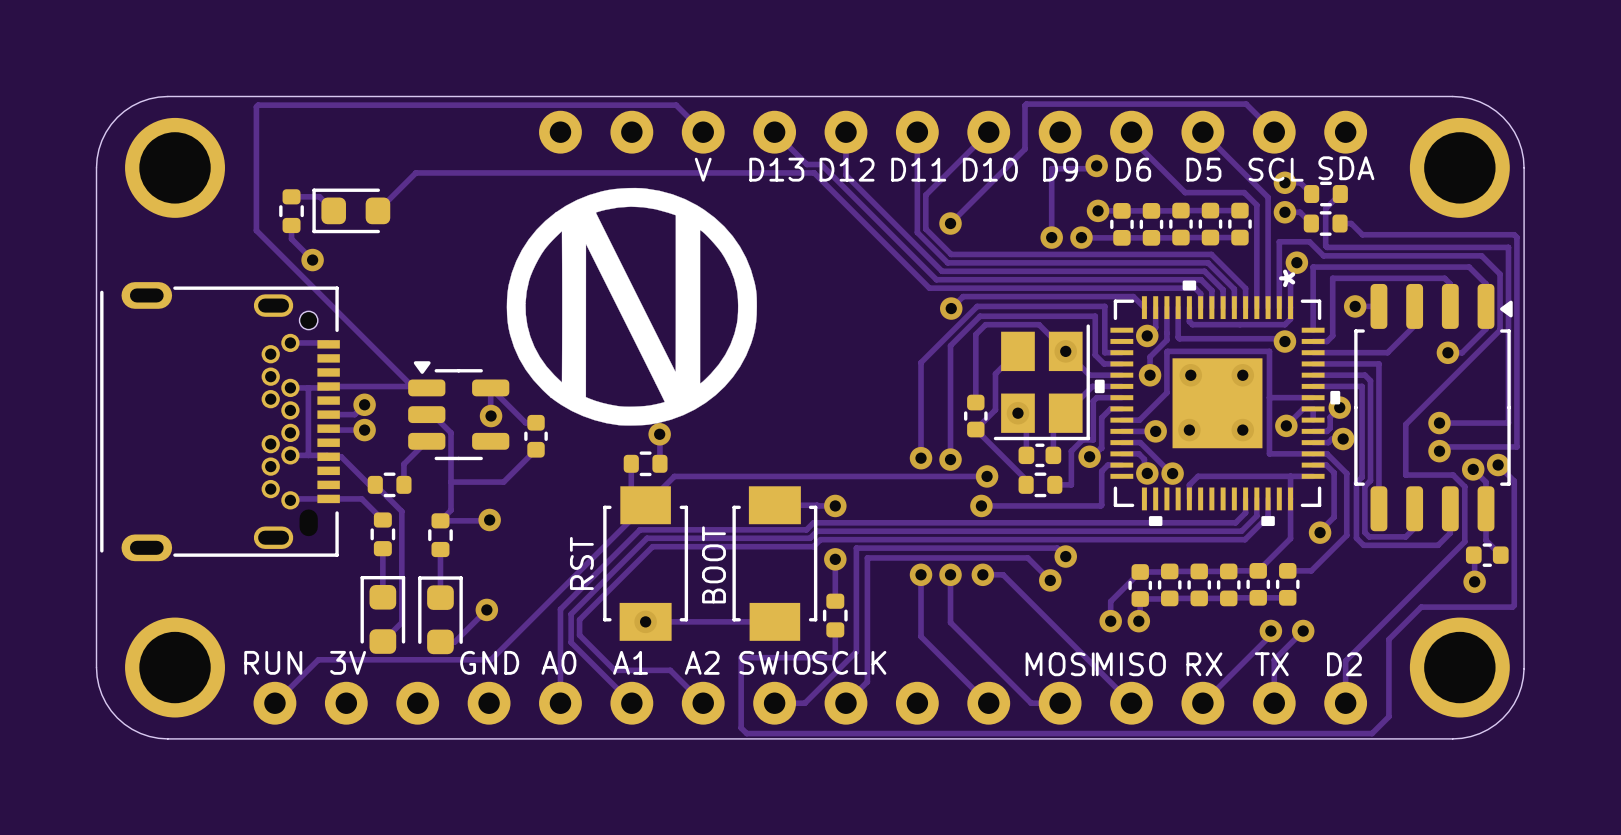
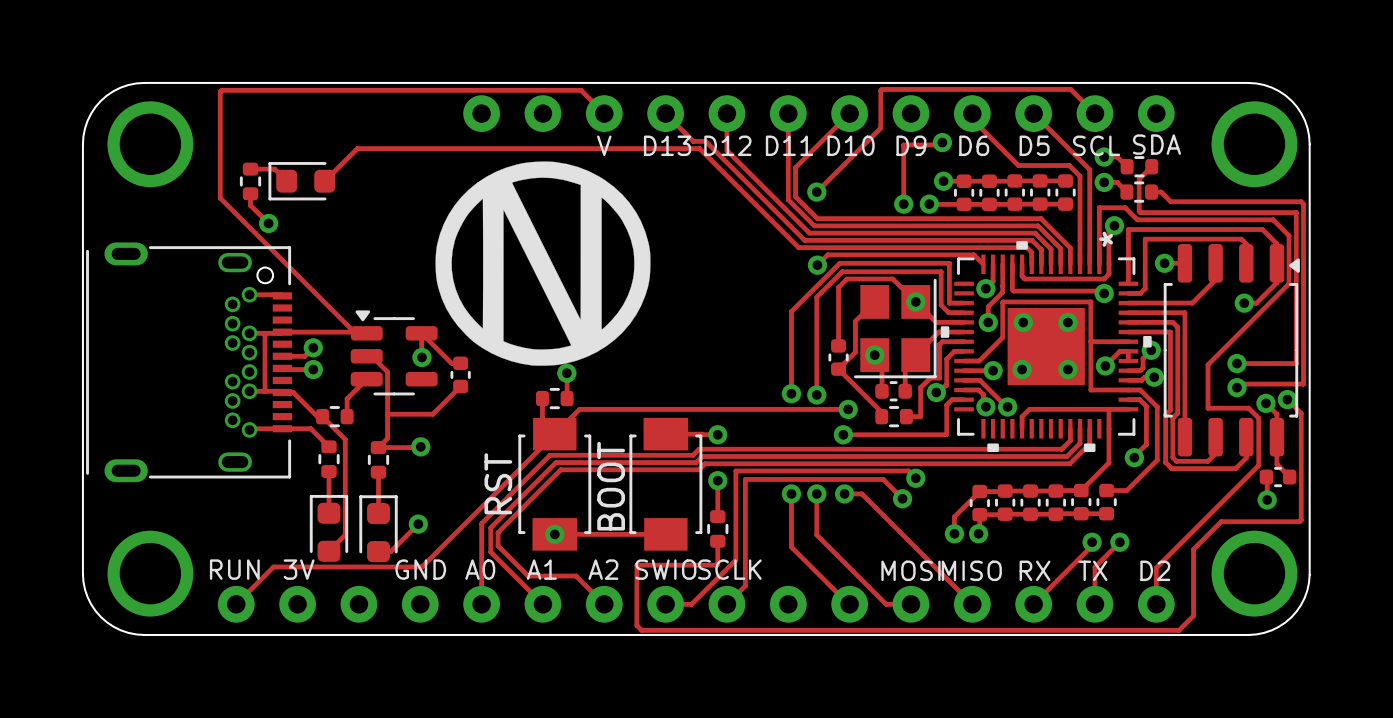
RST name: none -> RST (498, 483)
text: RST (581, 563) -> none
text: BOOT (713, 564) -> none
BOOT name: none -> BOOT (611, 486)

